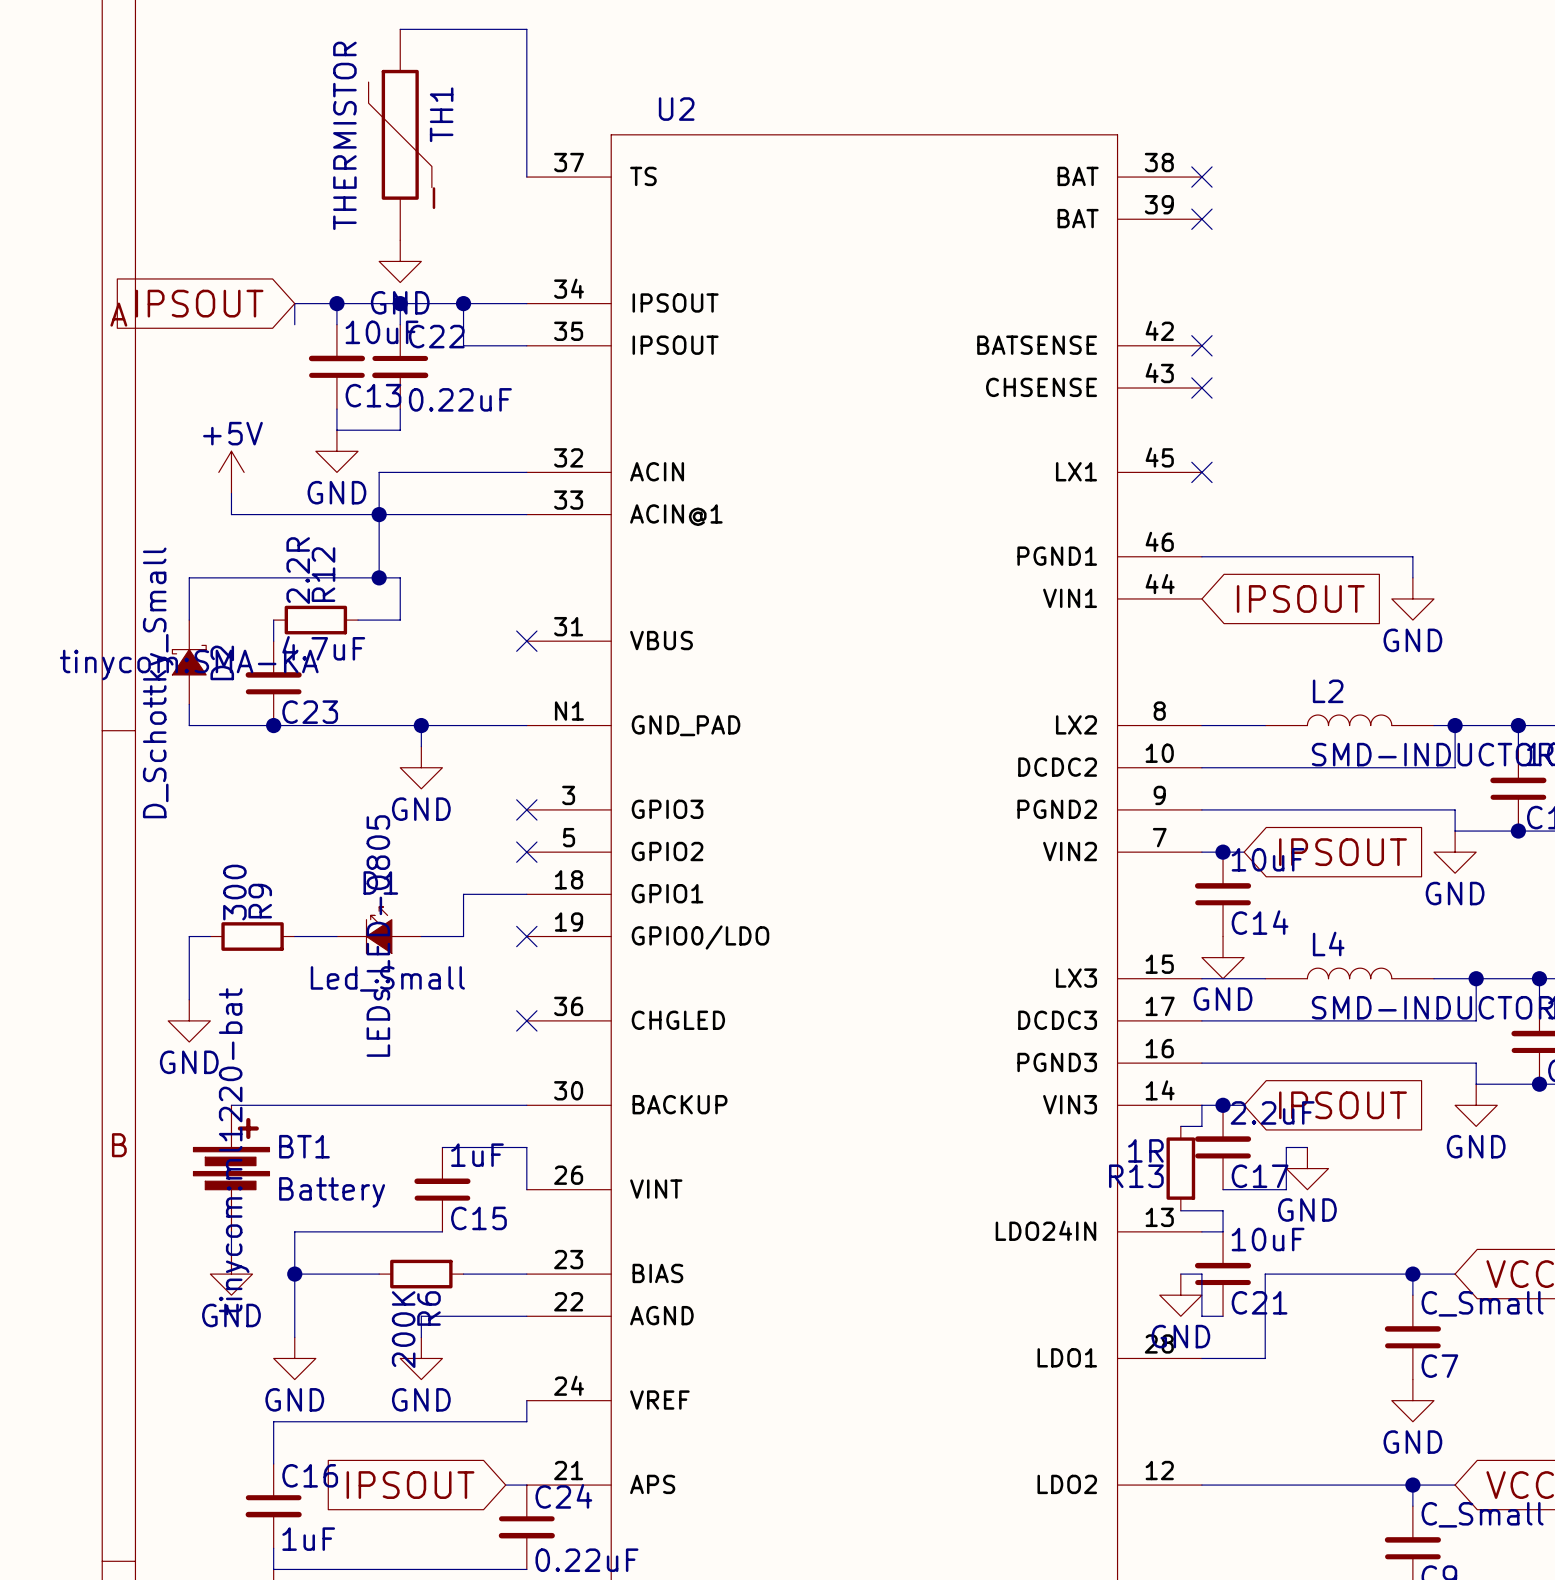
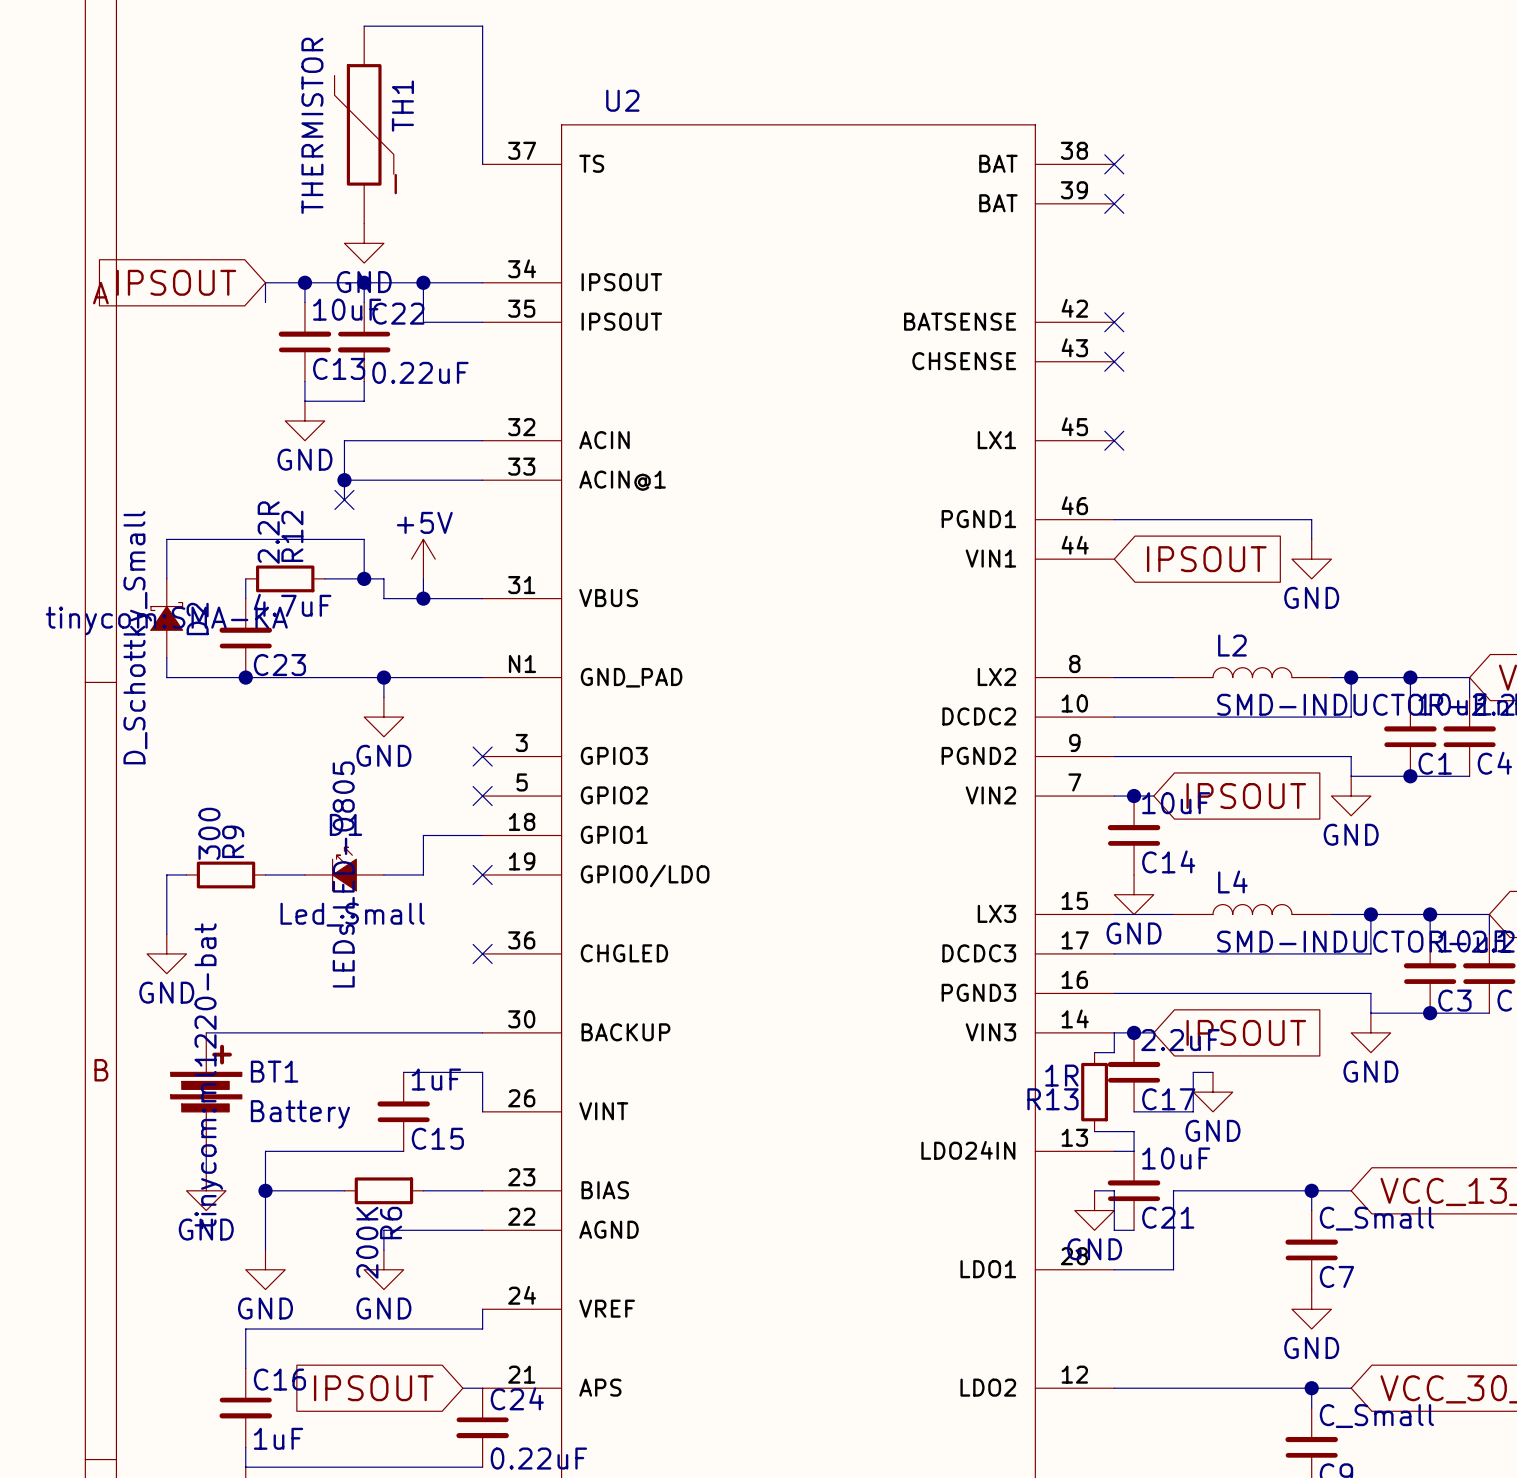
power symbol position: +5V (231, 472) -> +5V (423, 559)
wire: (231, 493) (231, 514) (379, 514) -> none
wire: (379, 535) (379, 577) -> none
no-connect mark: none -> (344, 499)
junction position: (379, 577) -> (364, 578)
wire: none -> (364, 578) (383, 578) (383, 598) (482, 598)
wire: none -> (423, 578) (423, 598)
junction: none -> (423, 598)
no-connect mark: (526, 641) -> none

